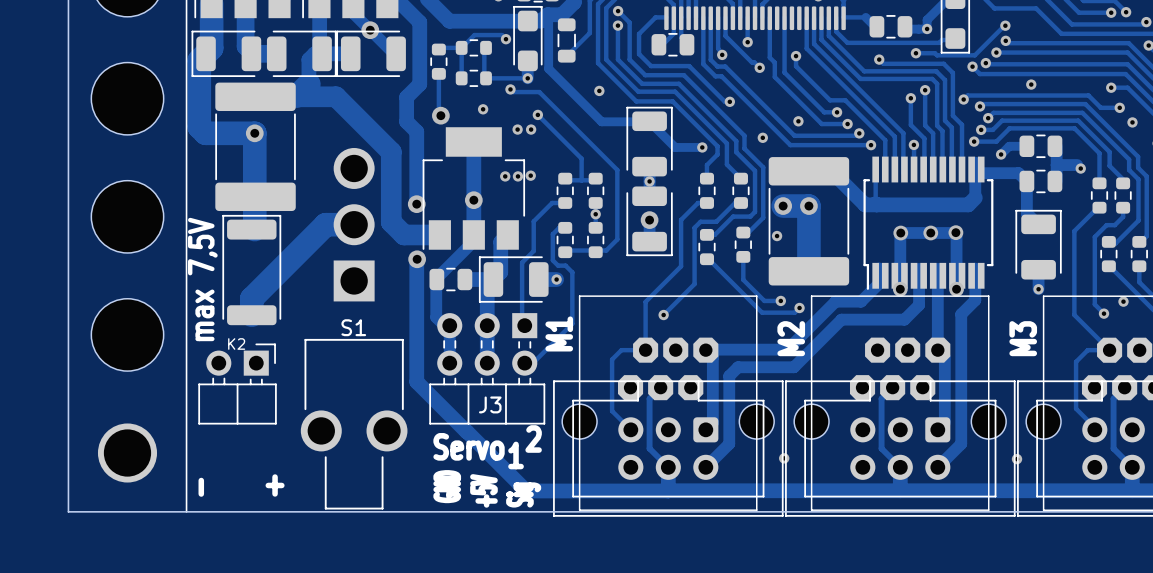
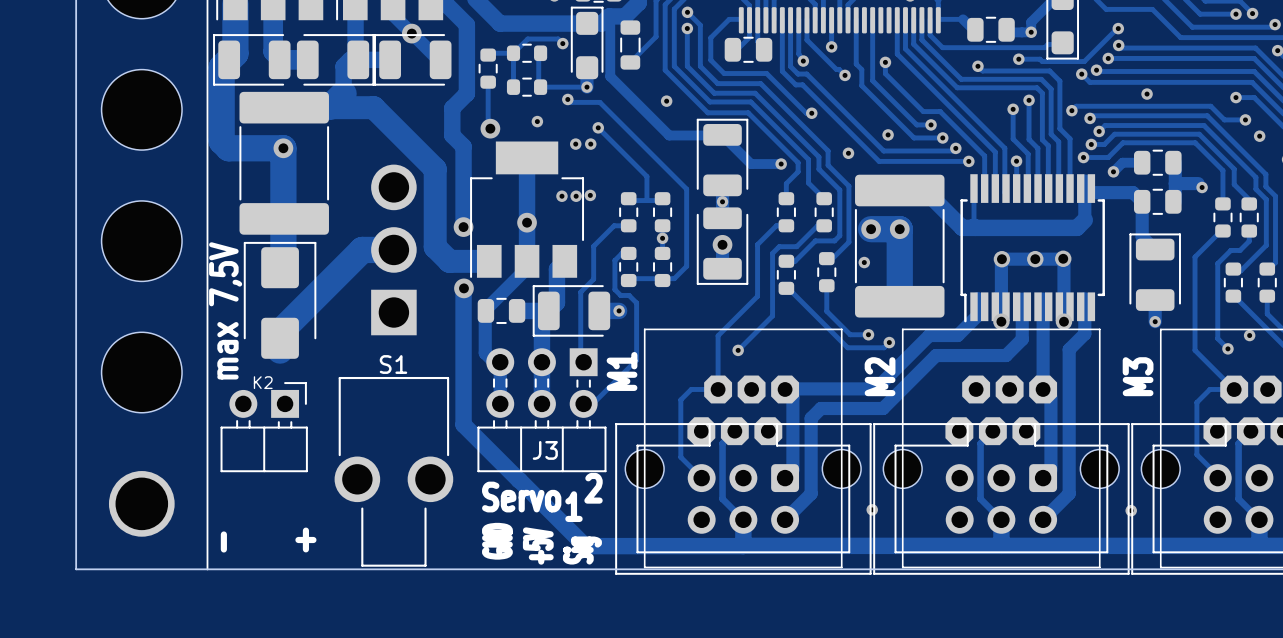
part footprint: [222, 214, 282, 326] -> [243, 241, 317, 359]

